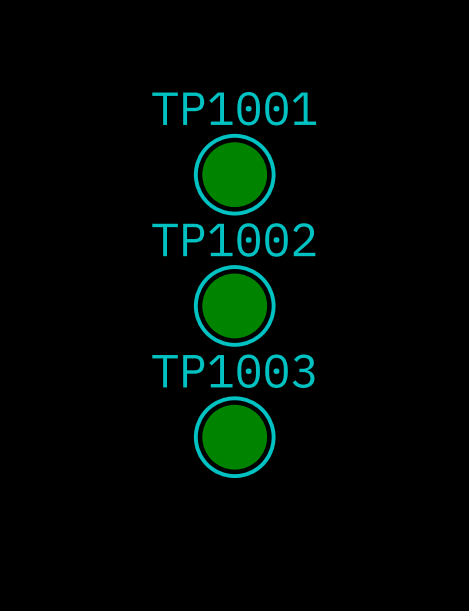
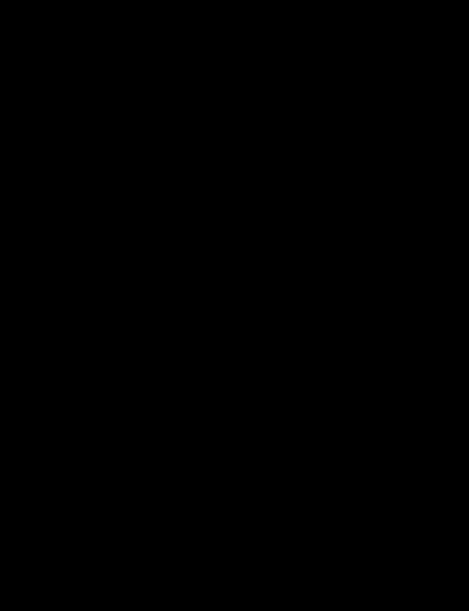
TP1001: (234, 174) -> none
TP1002: (234, 305) -> none
TP1003: (234, 437) -> none

